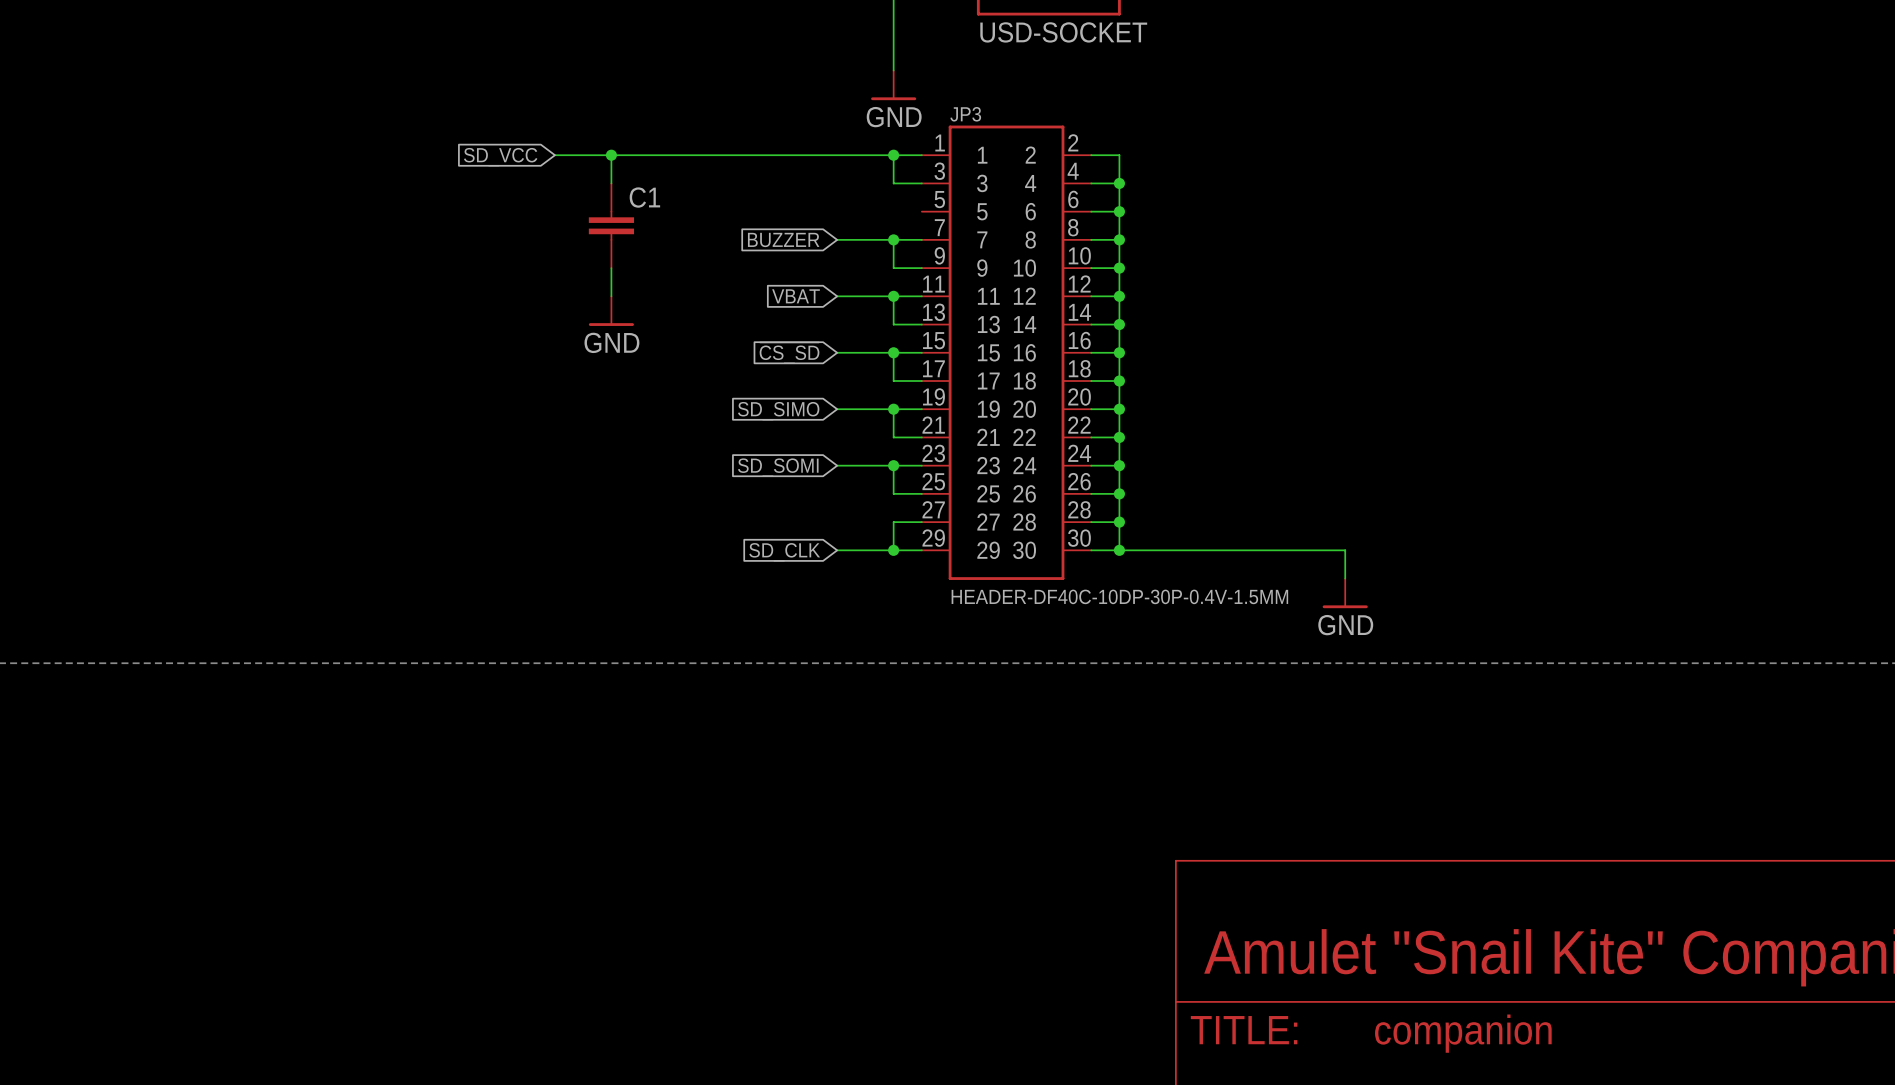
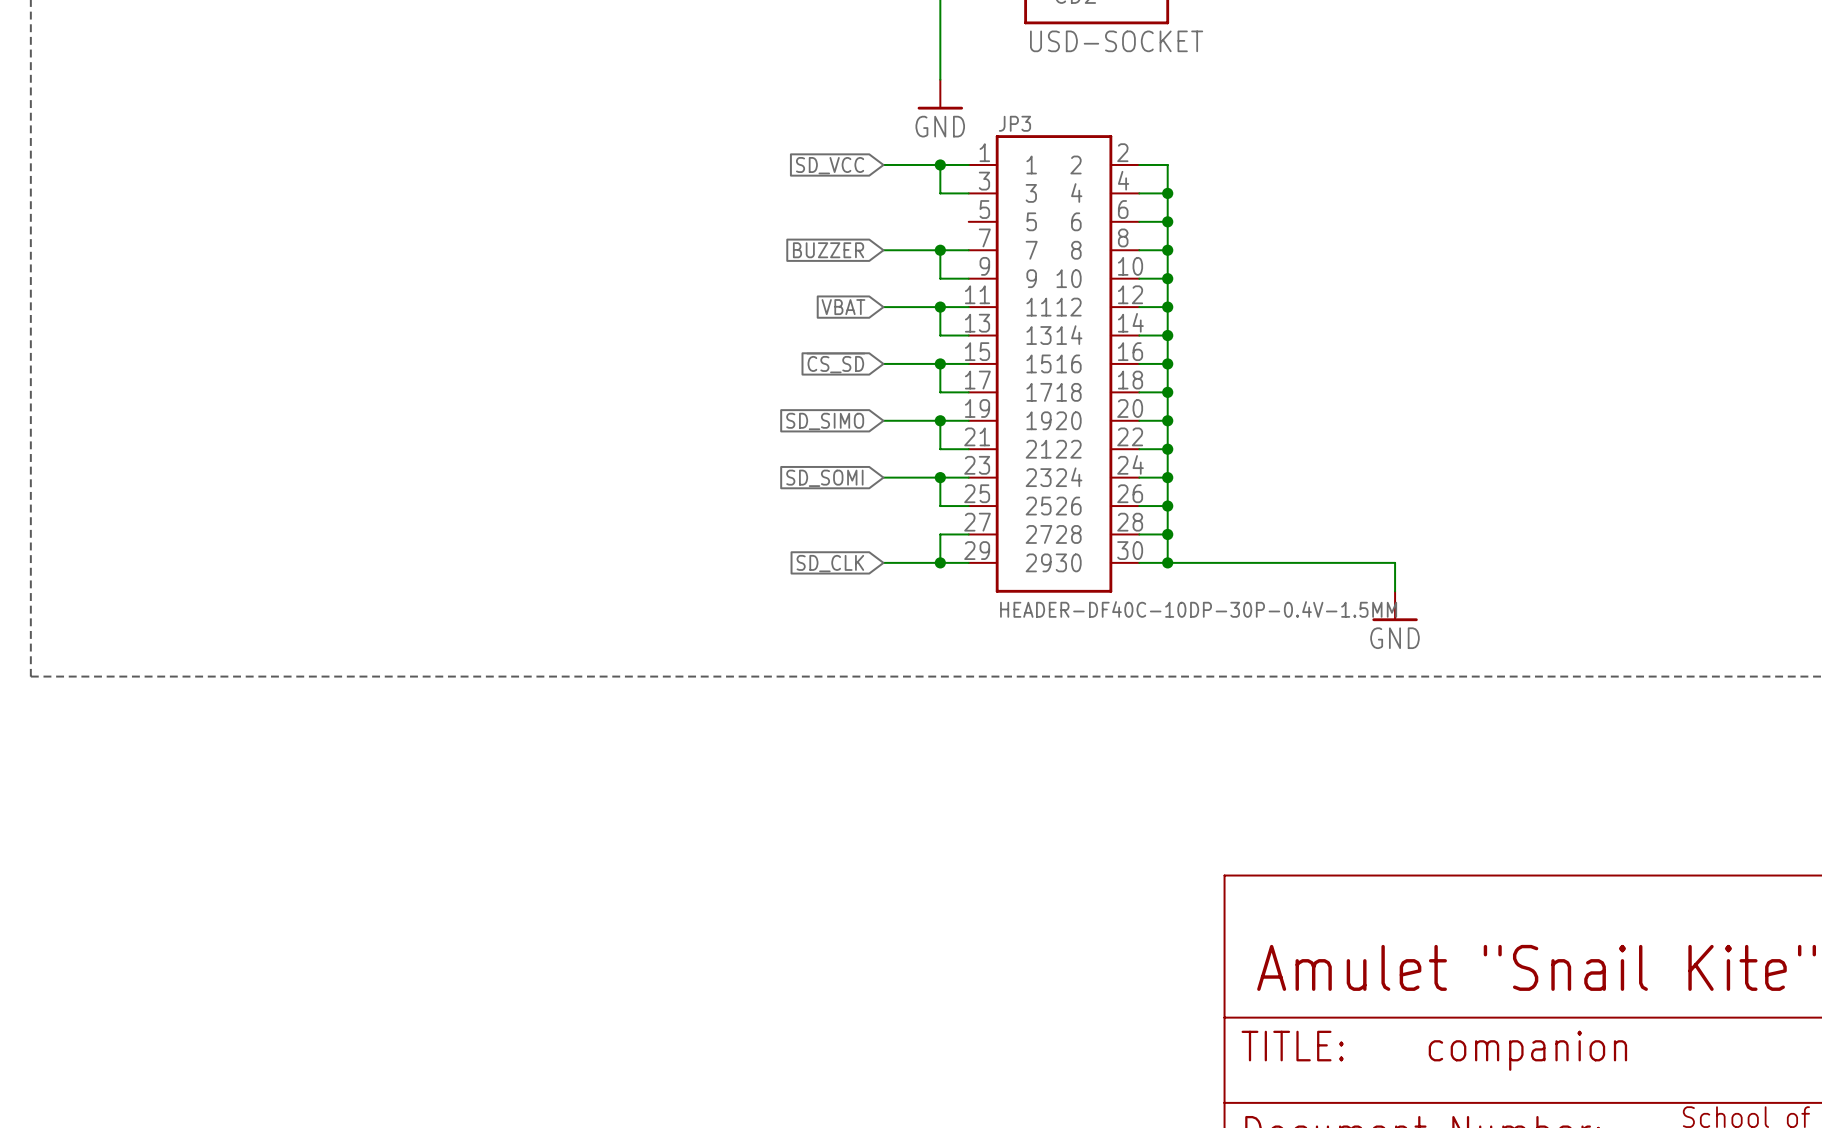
wire: (554, 155) (837, 155) -> none
wire: (611, 155) (611, 183) -> none
junction: (611, 155) -> none
global label: SD_VCC (500, 157) -> none
global label: none -> SD_VCC (830, 165)
C1: (611, 225) -> none
wire: (611, 268) (611, 296) -> none
power symbol: GND (611, 311) -> none

